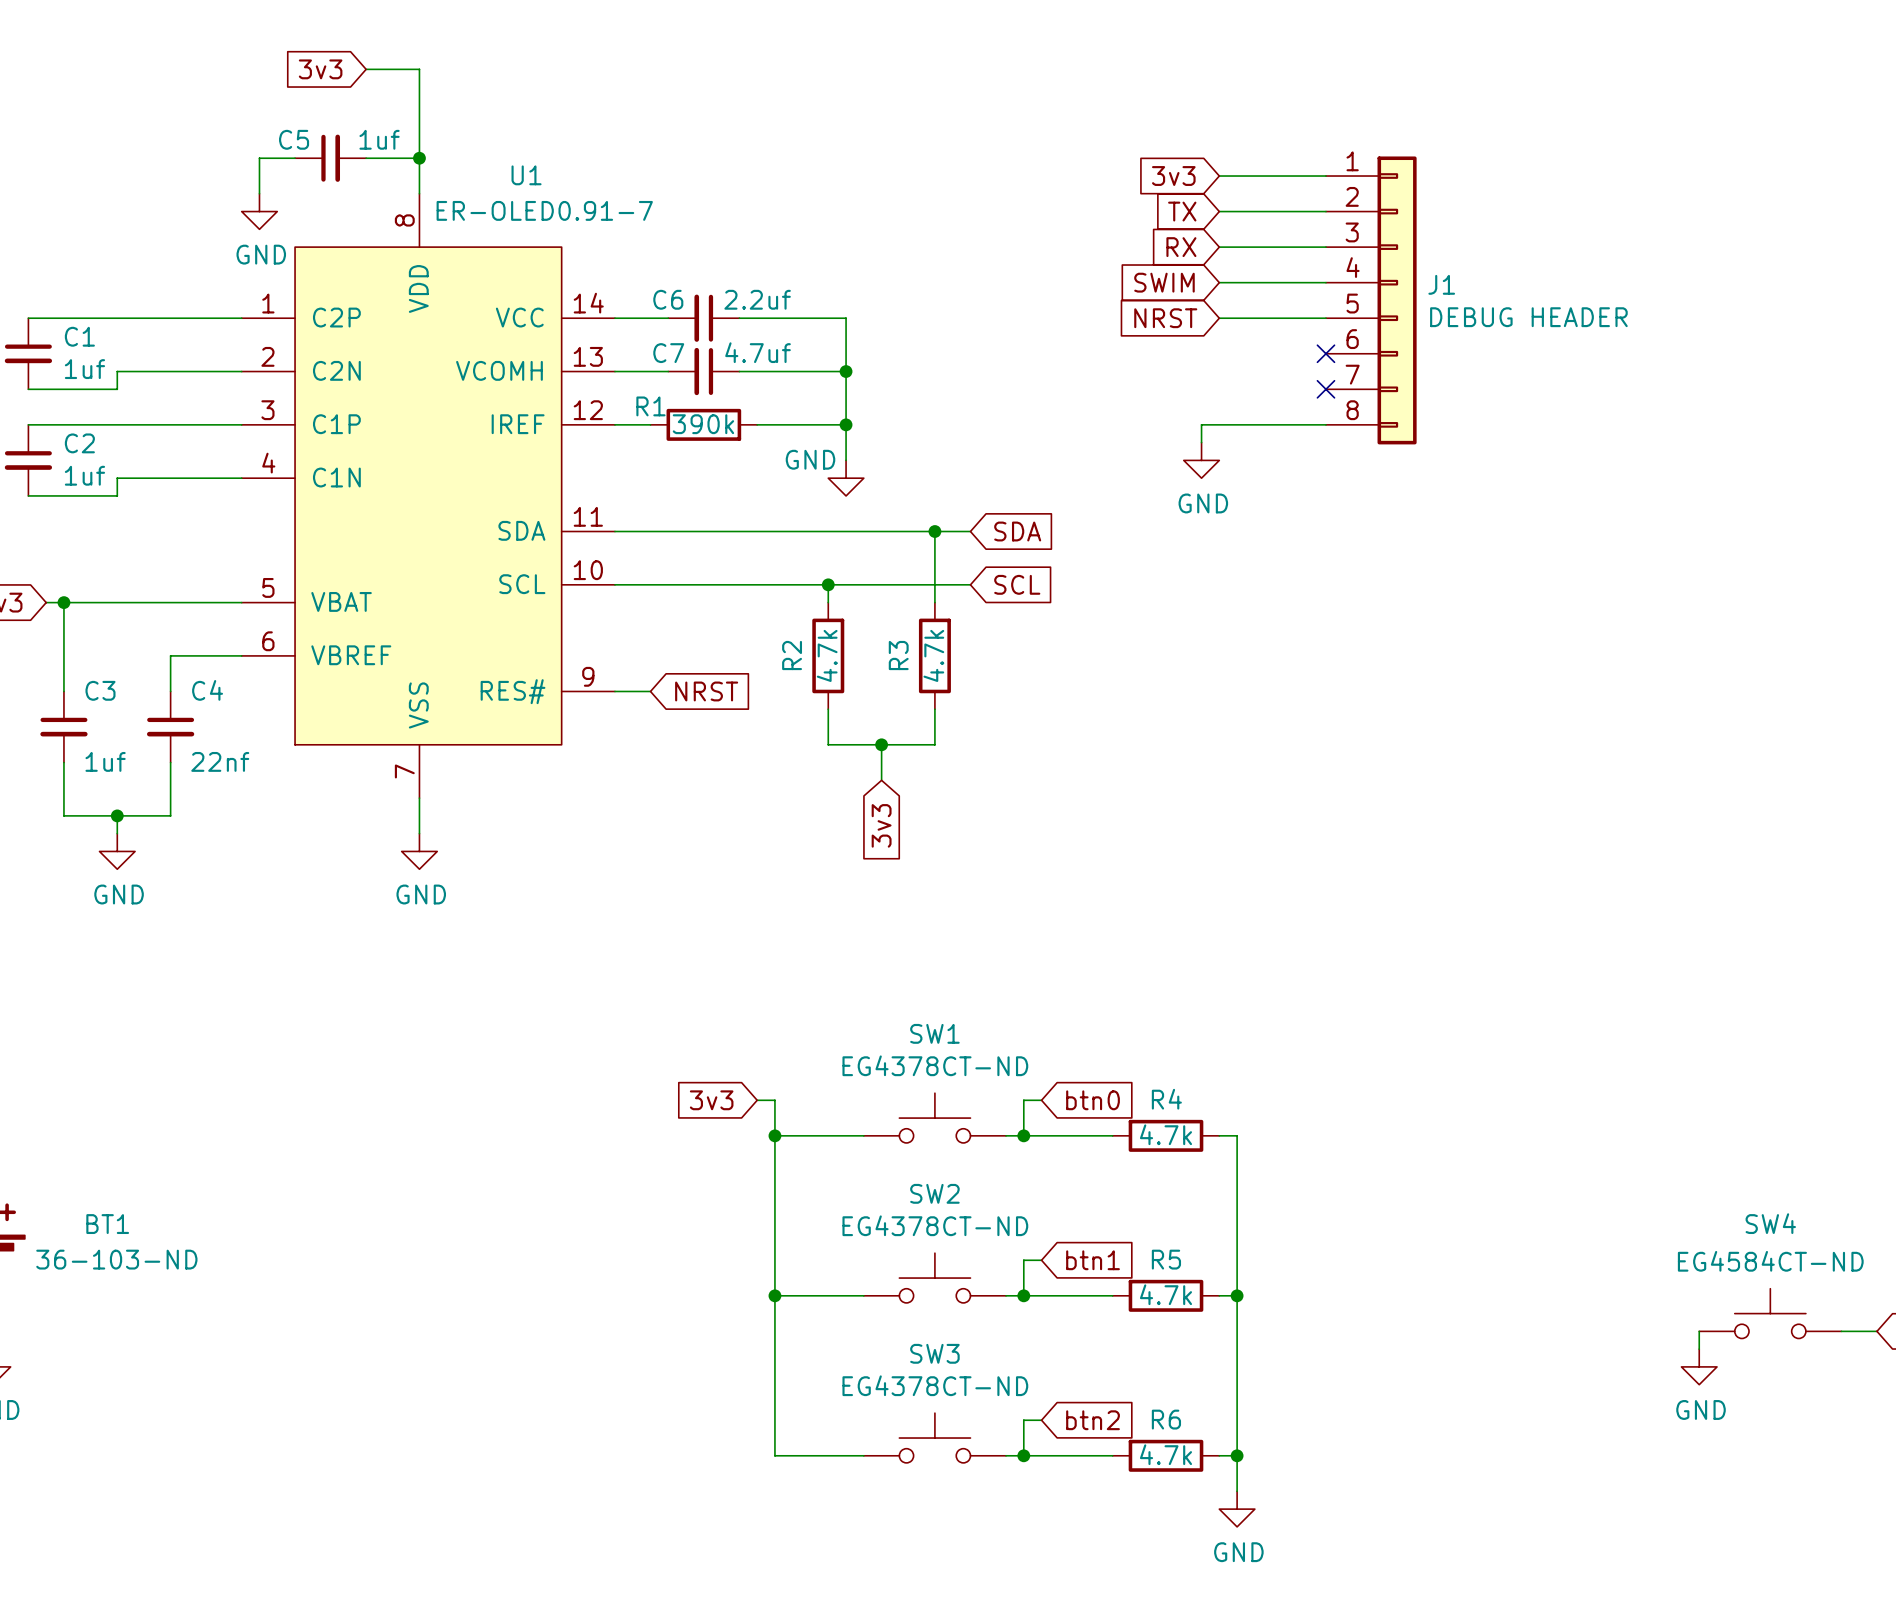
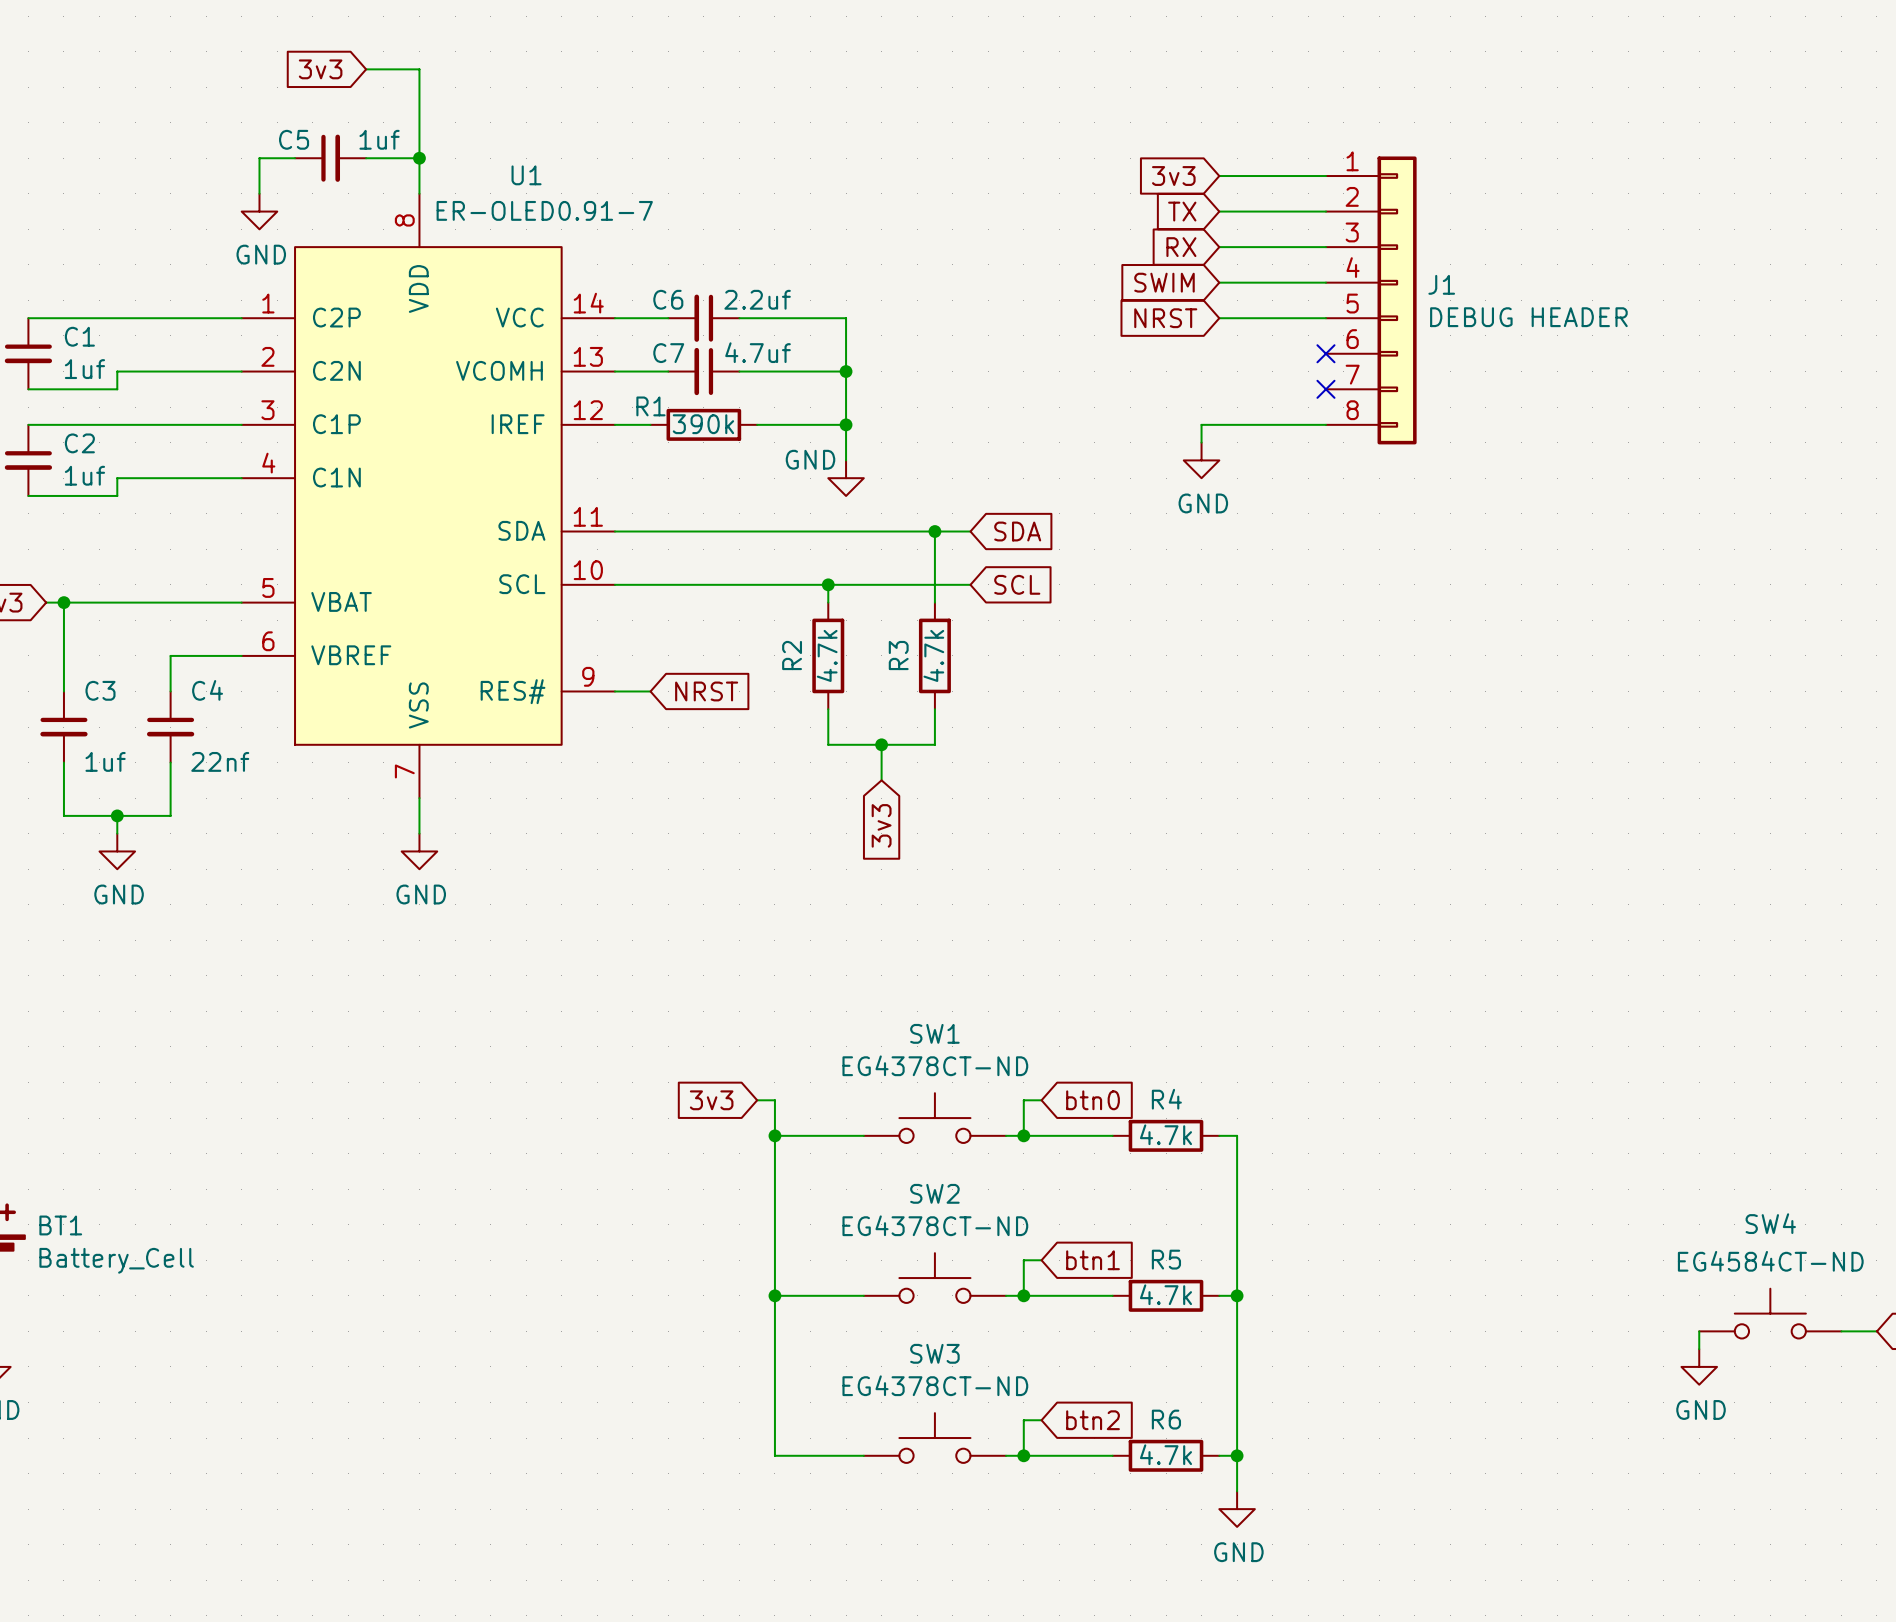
BT1 name position: BT1 (107, 1224) -> BT1 (60, 1225)
BT1 text: 36-103-ND (116, 1259) -> none
BT1 value: none -> Battery_Cell (116, 1260)

